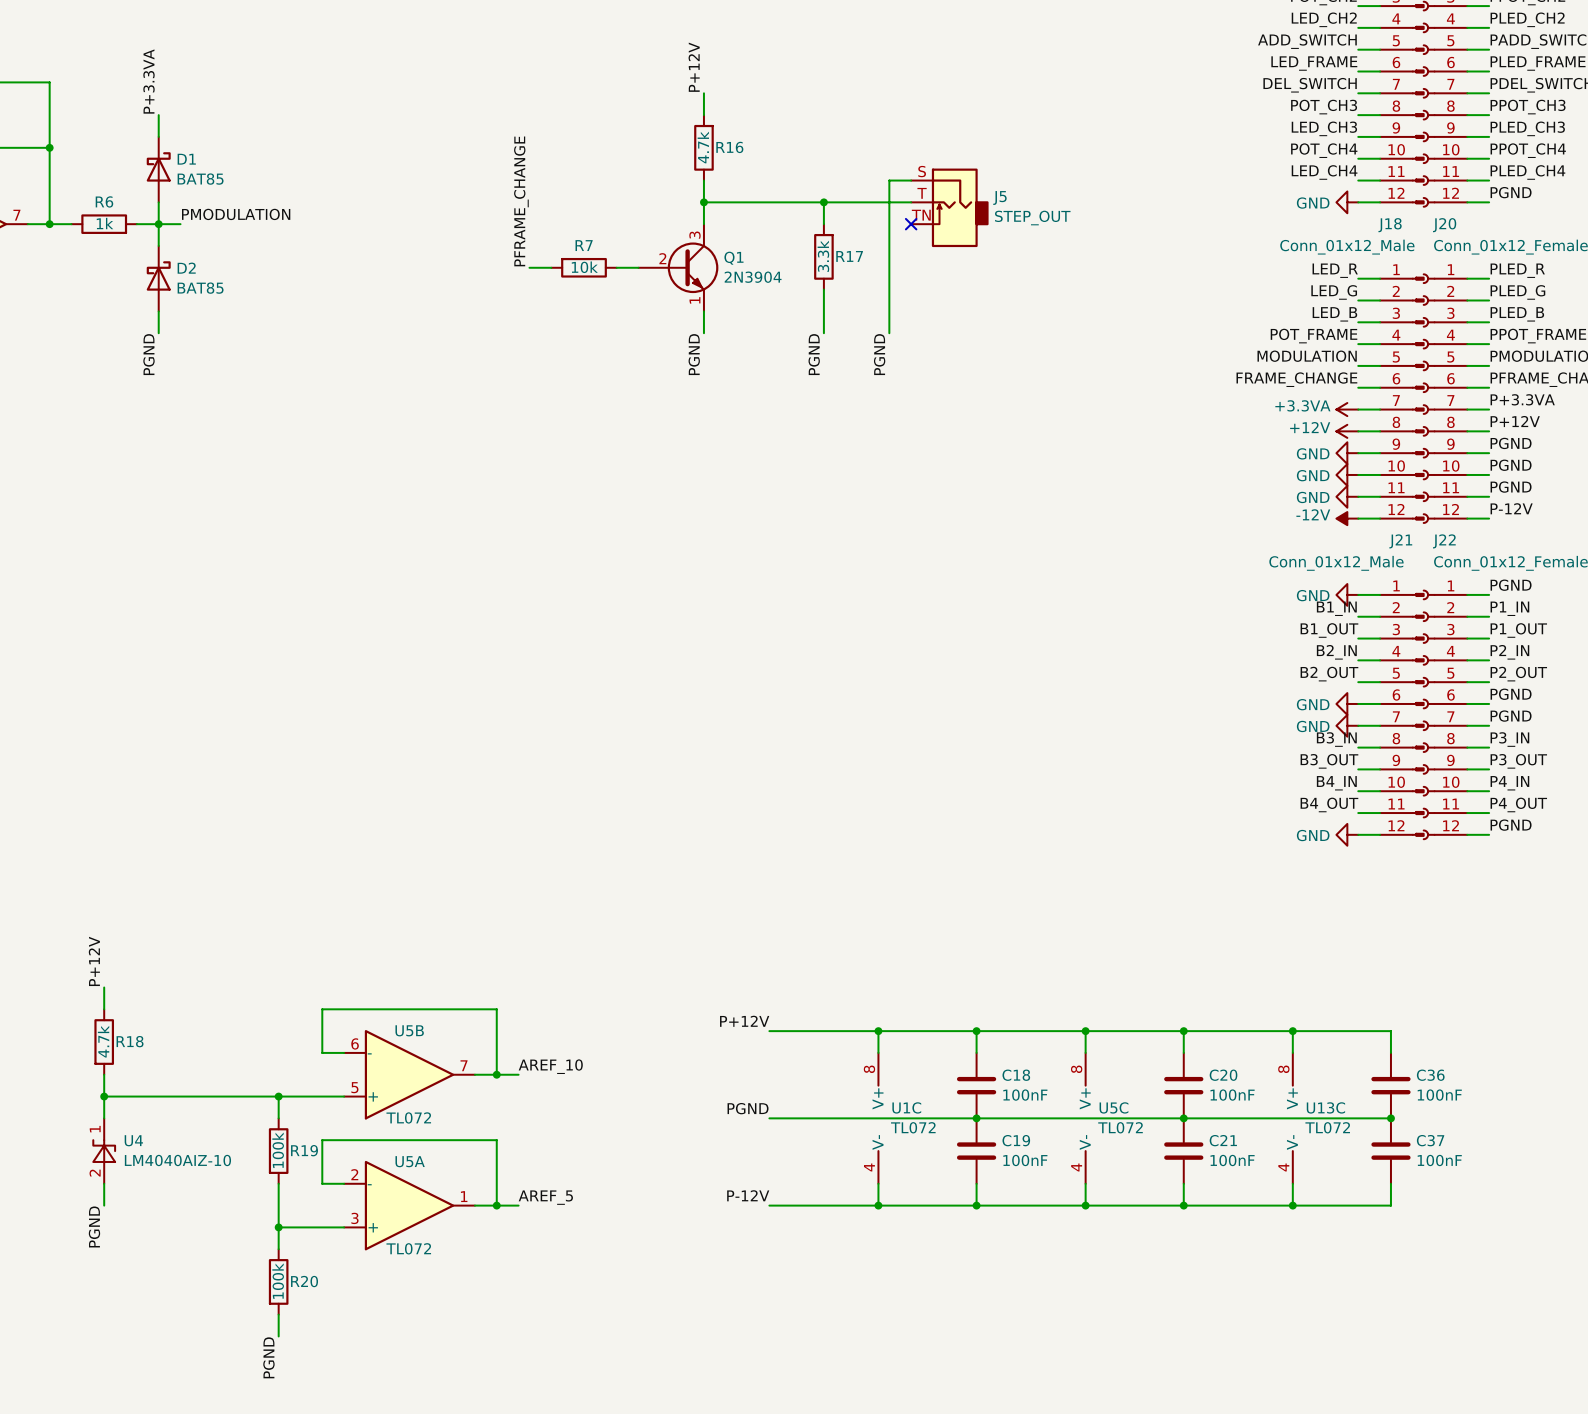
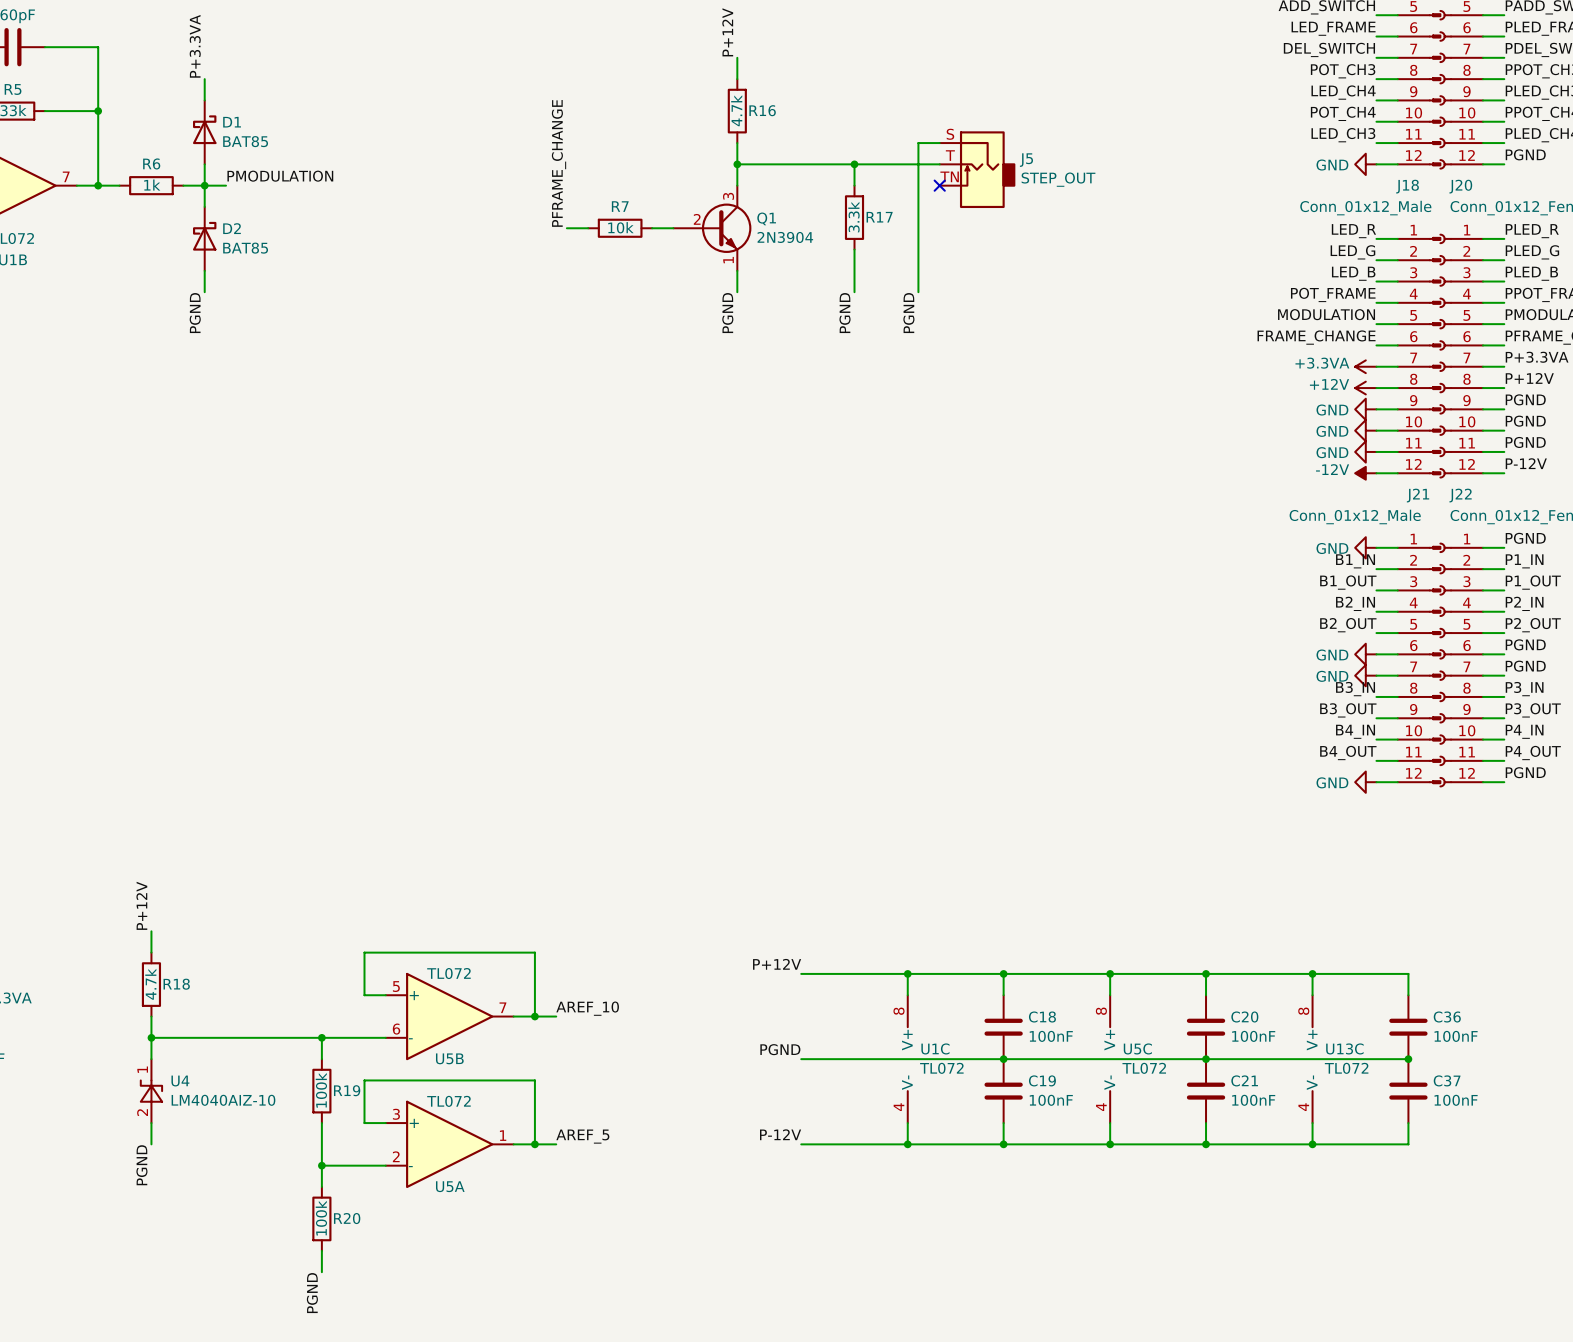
label: LED_CH3 (1324, 128) -> LED_CH4 (1343, 92)
label: LED_CH4 (1324, 172) -> LED_CH3 (1343, 135)
U5B flip: as is (409, 1074) -> up-down (449, 1016)
U5A flip: as is (409, 1205) -> up-down (449, 1144)

